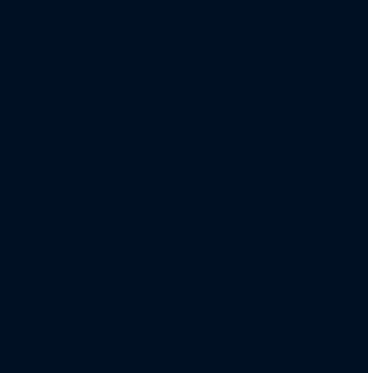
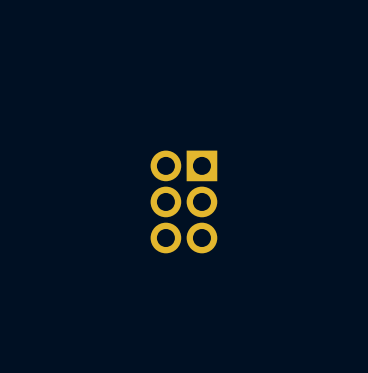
part: none -> (183, 201)

